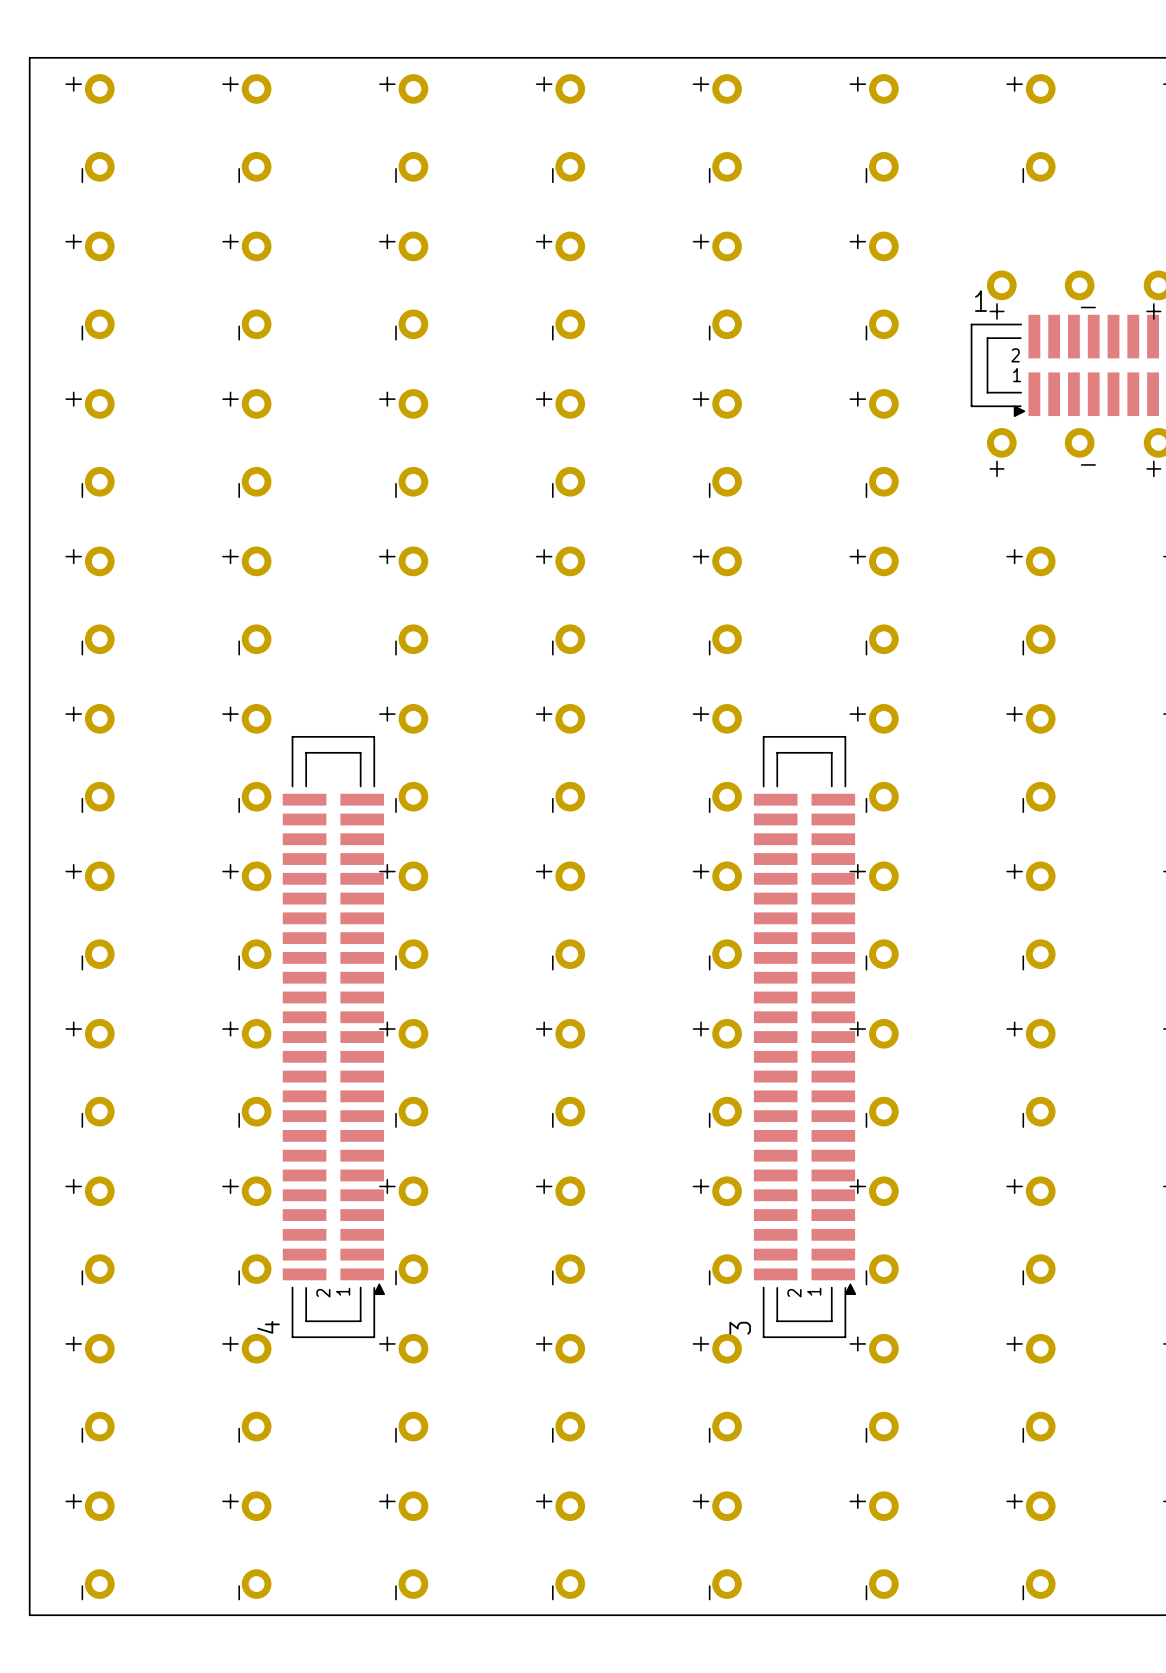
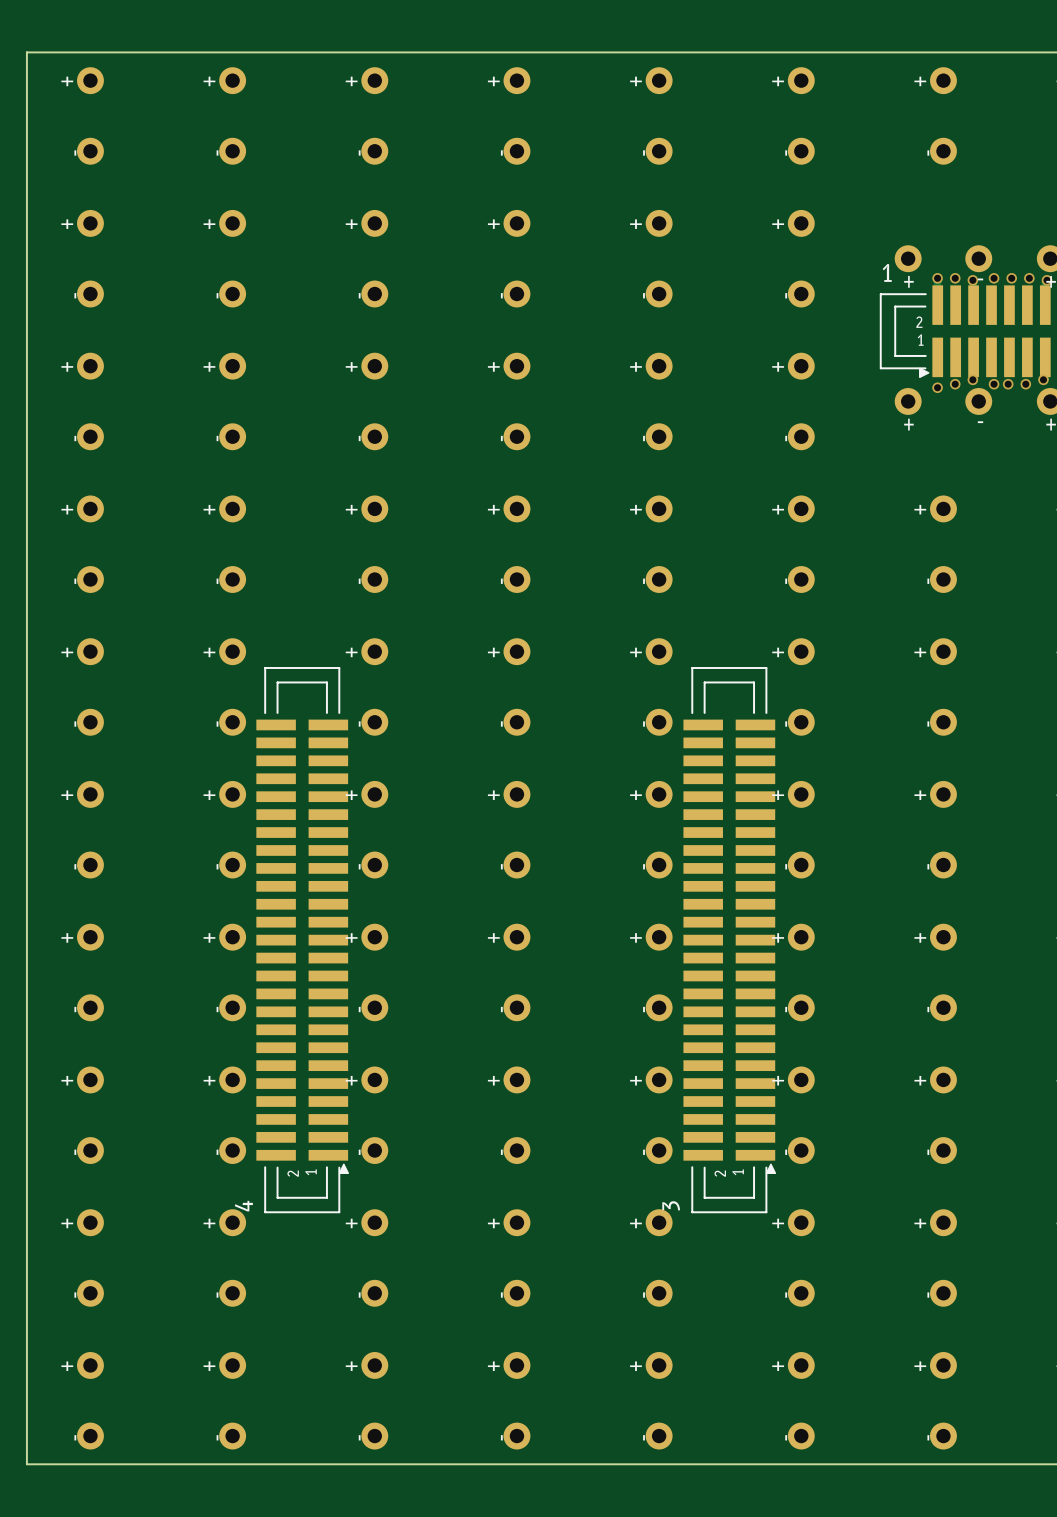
via: none -> (937, 278)
via: none -> (955, 278)
via: none -> (994, 278)
via: none -> (1011, 278)
via: none -> (1029, 278)
via: none -> (972, 280)
via: none -> (1047, 280)
via: none -> (972, 379)
via: none -> (1043, 379)
via: none -> (955, 384)
via: none -> (994, 384)
via: none -> (1008, 384)
via: none -> (1025, 384)
via: none -> (937, 387)

